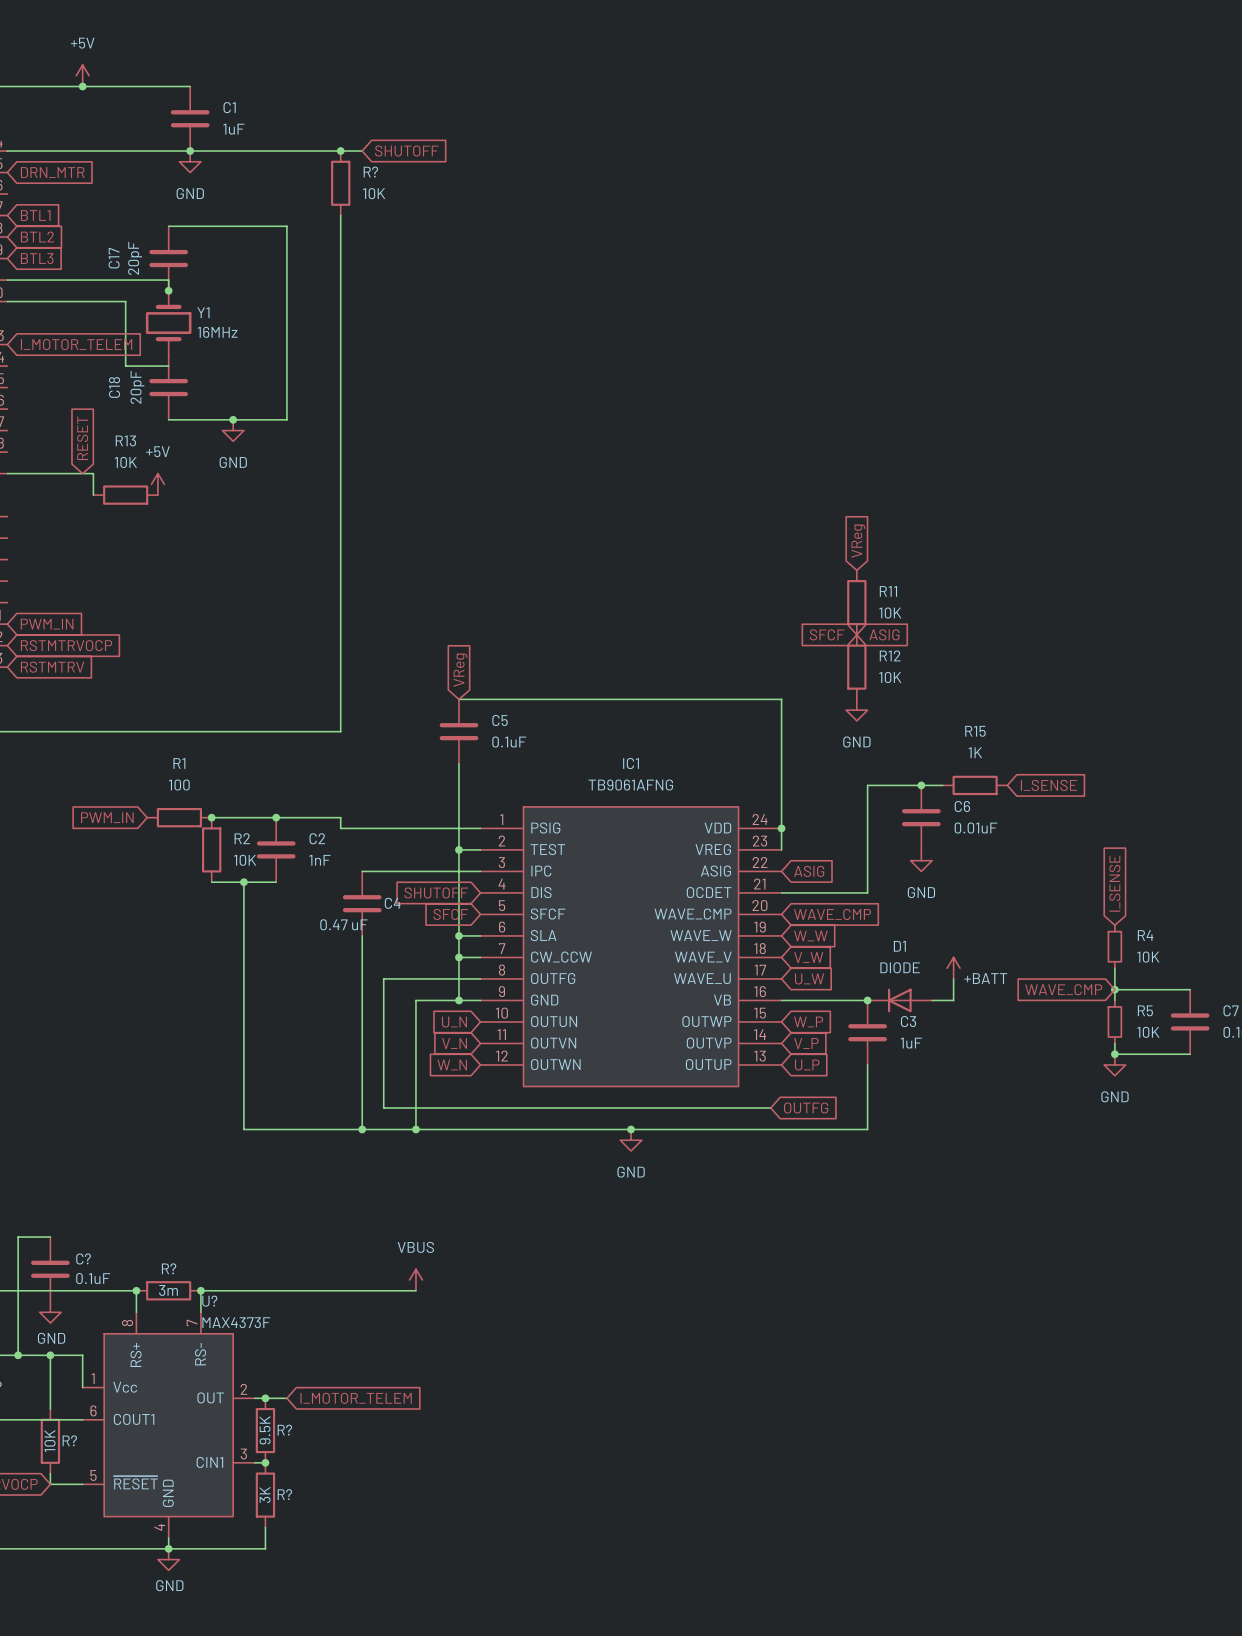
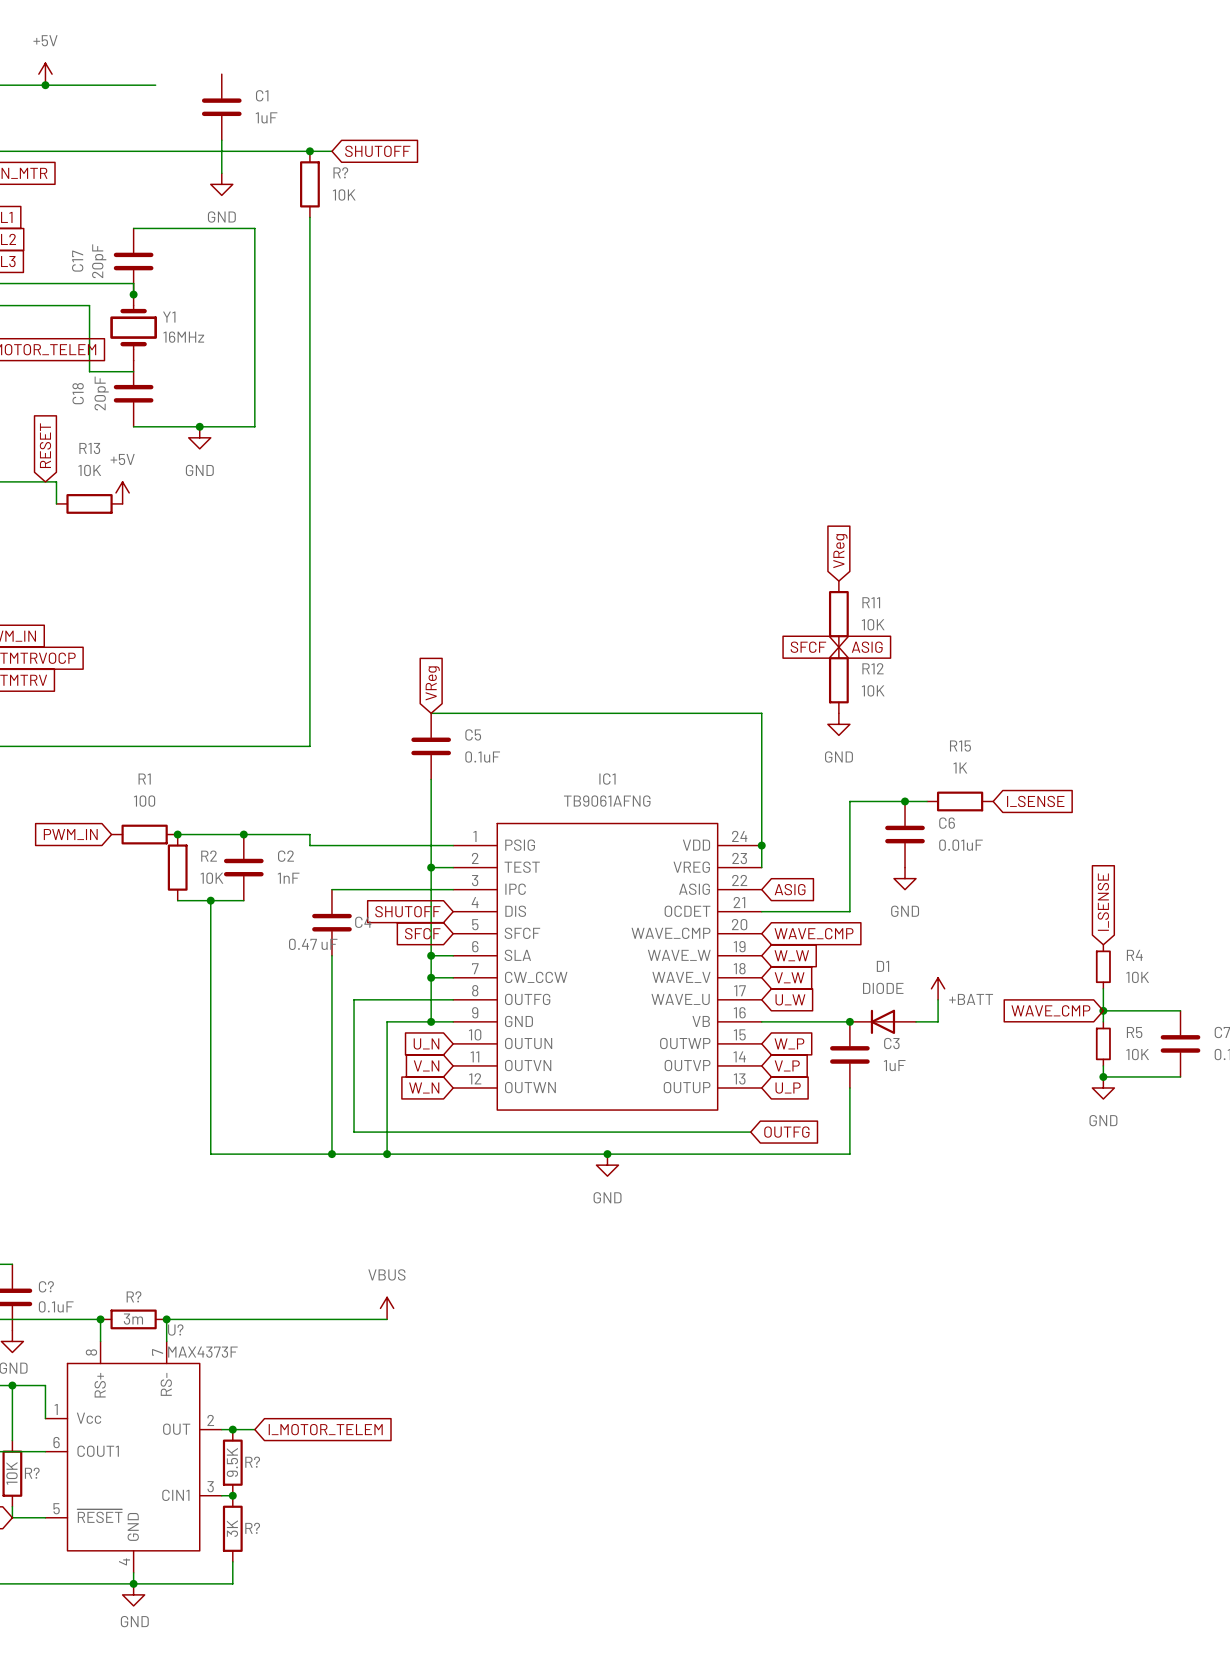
C1 position: (190, 118) -> (221, 107)
wire: none -> (221, 140) (221, 173)
junction: (190, 151) -> none
power symbol position: GND (190, 161) -> GND (221, 184)

